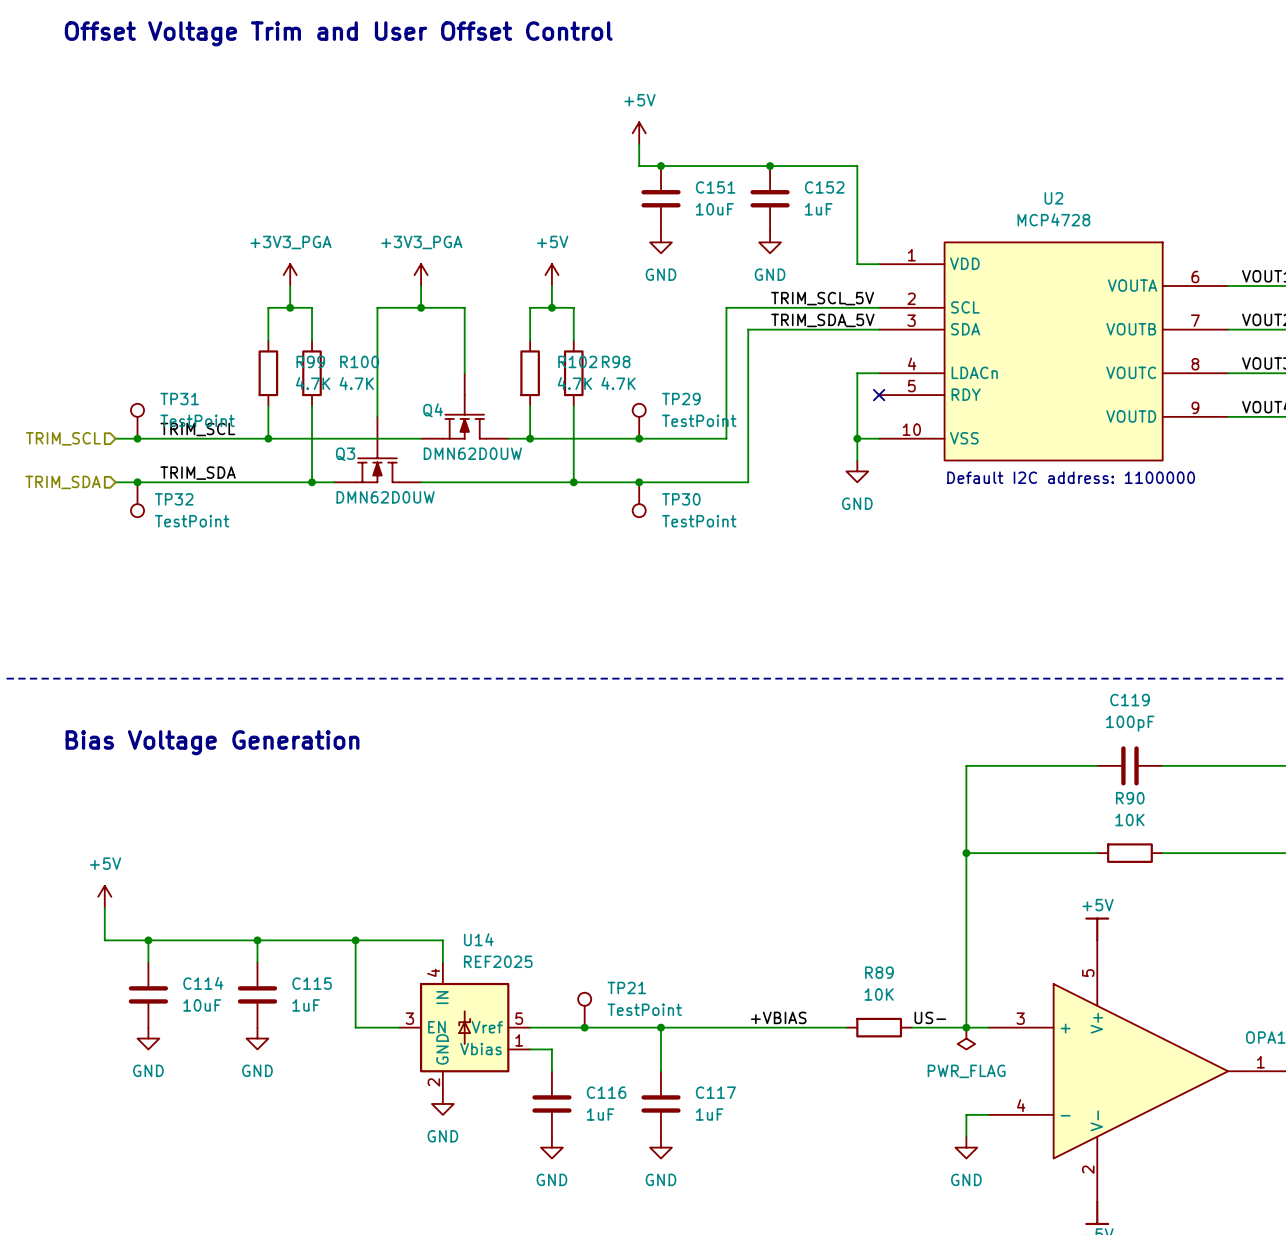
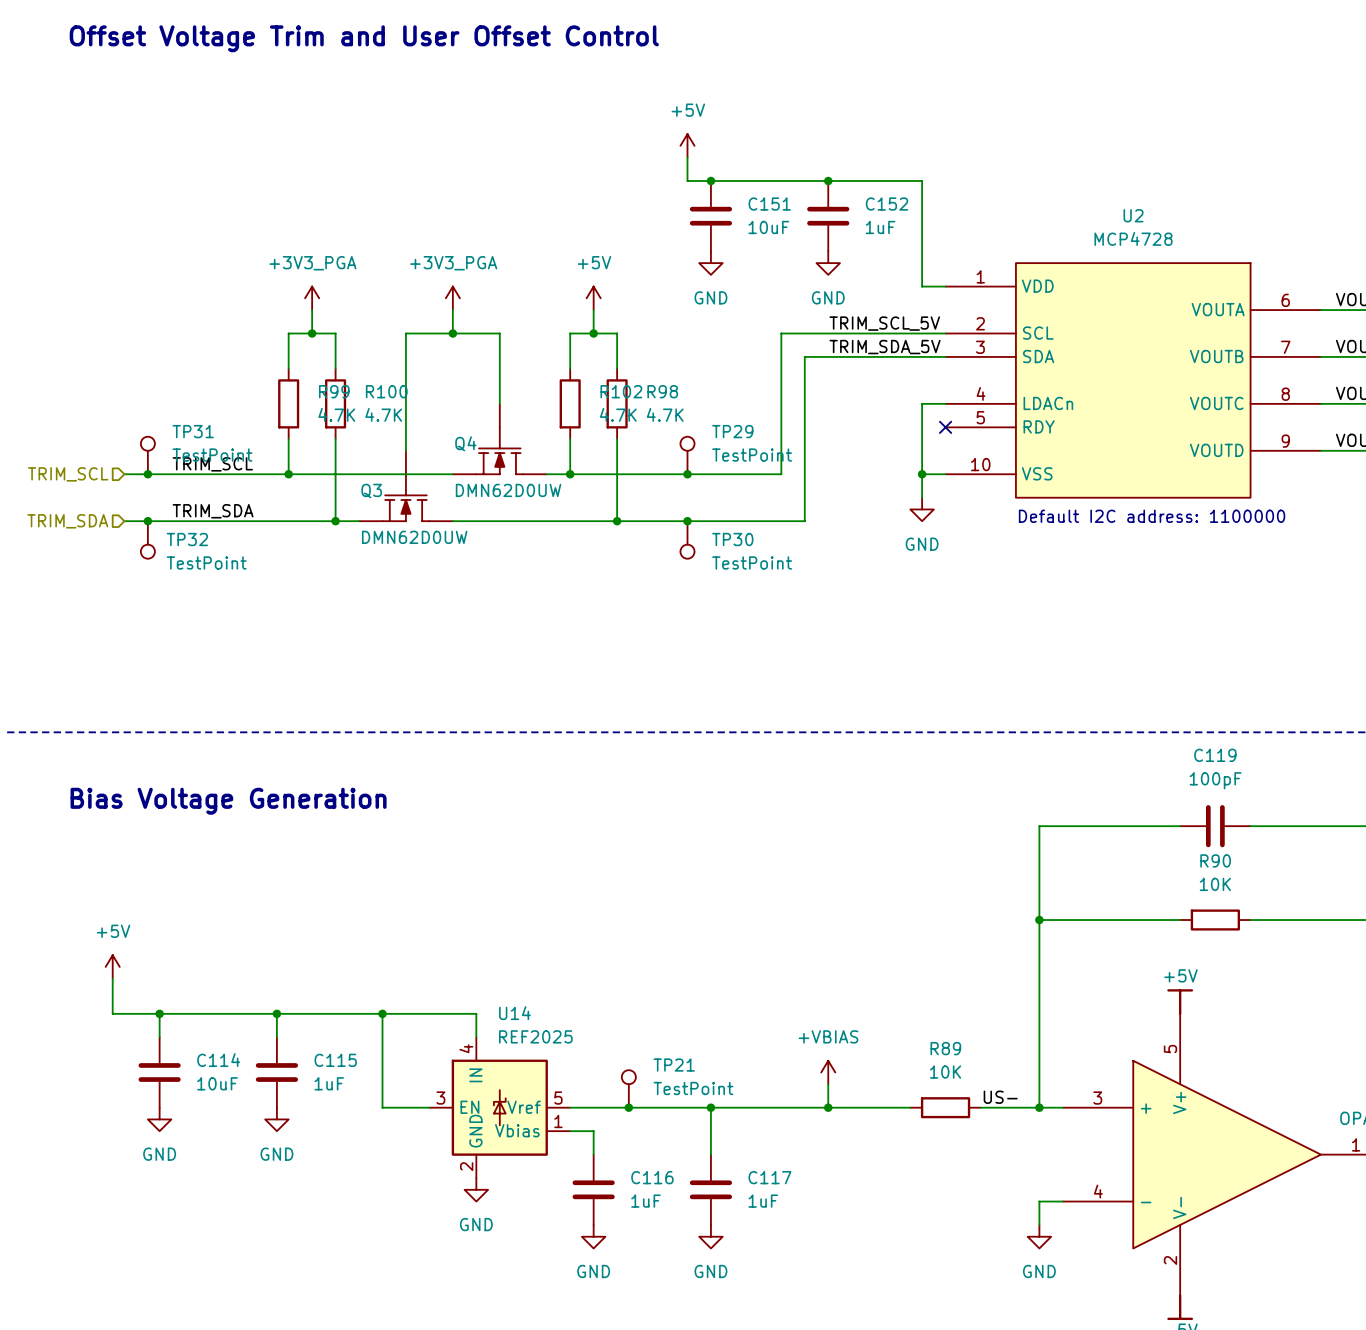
power symbol: none -> +VBIAS (828, 1072)
wire: none -> (828, 1084) (828, 1107)
label: +VBIAS (778, 1017) -> none
junction: none -> (828, 1107)
power symbol: PWR_FLAG (966, 1038) -> none

